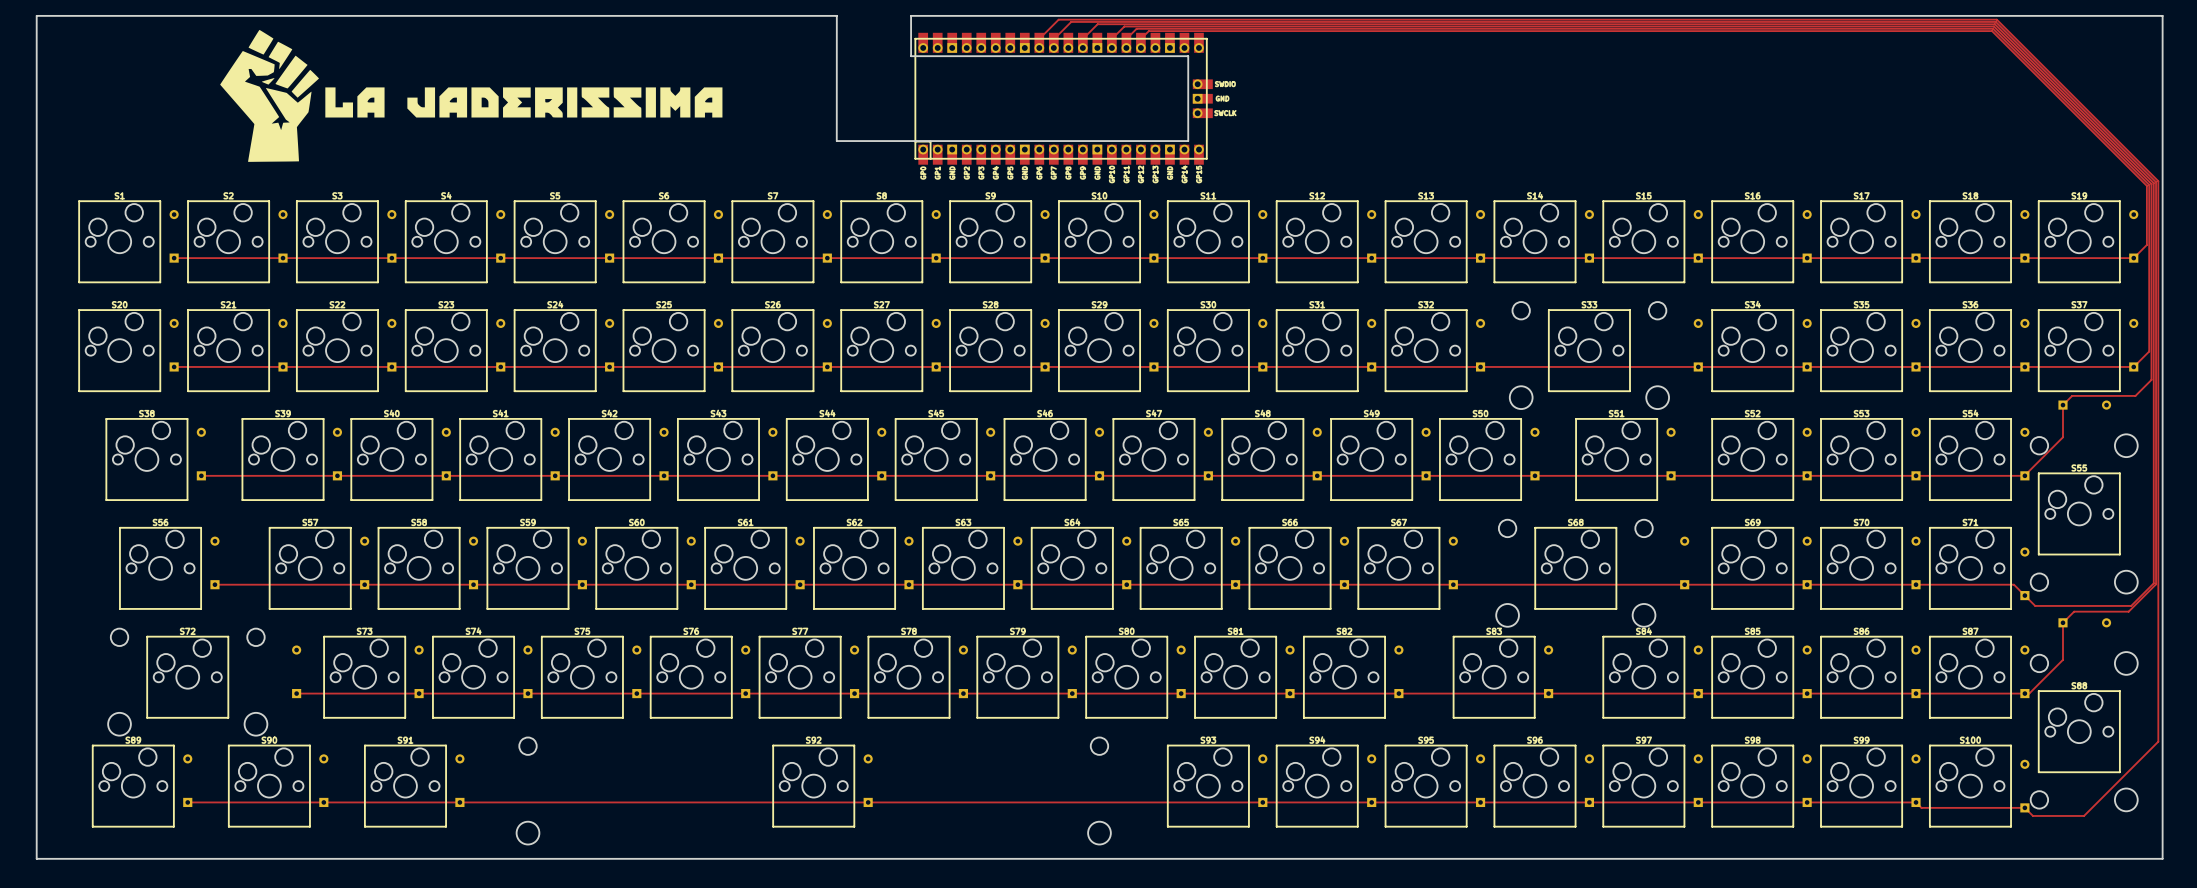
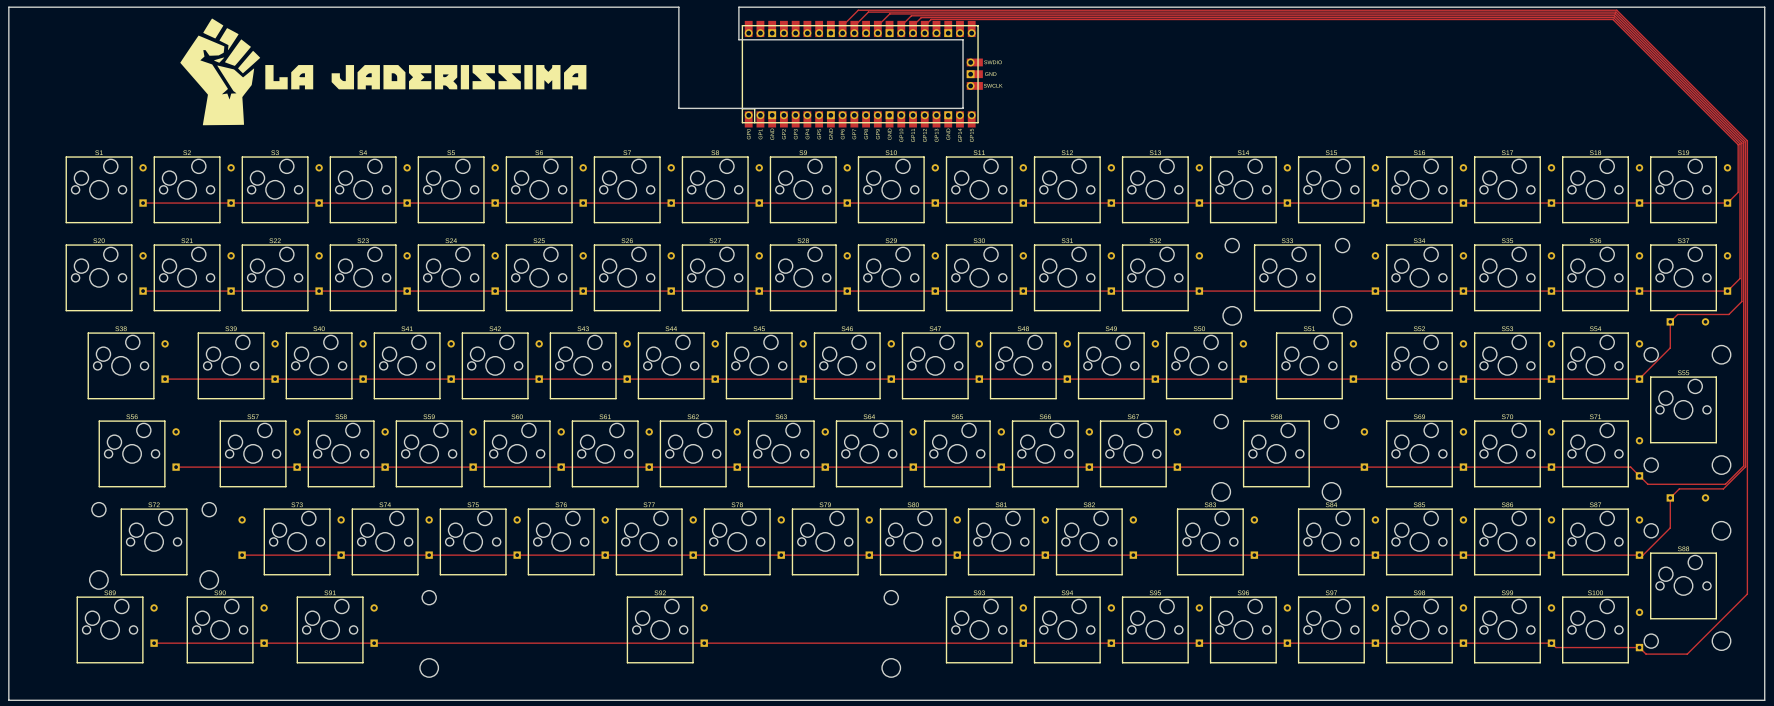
board edge: (36, 15) (36, 858) (2162, 858) (2162, 15) -> (31, 7) (8, 7) (8, 700) (1764, 700) (1764, 7) (1750, 7)

